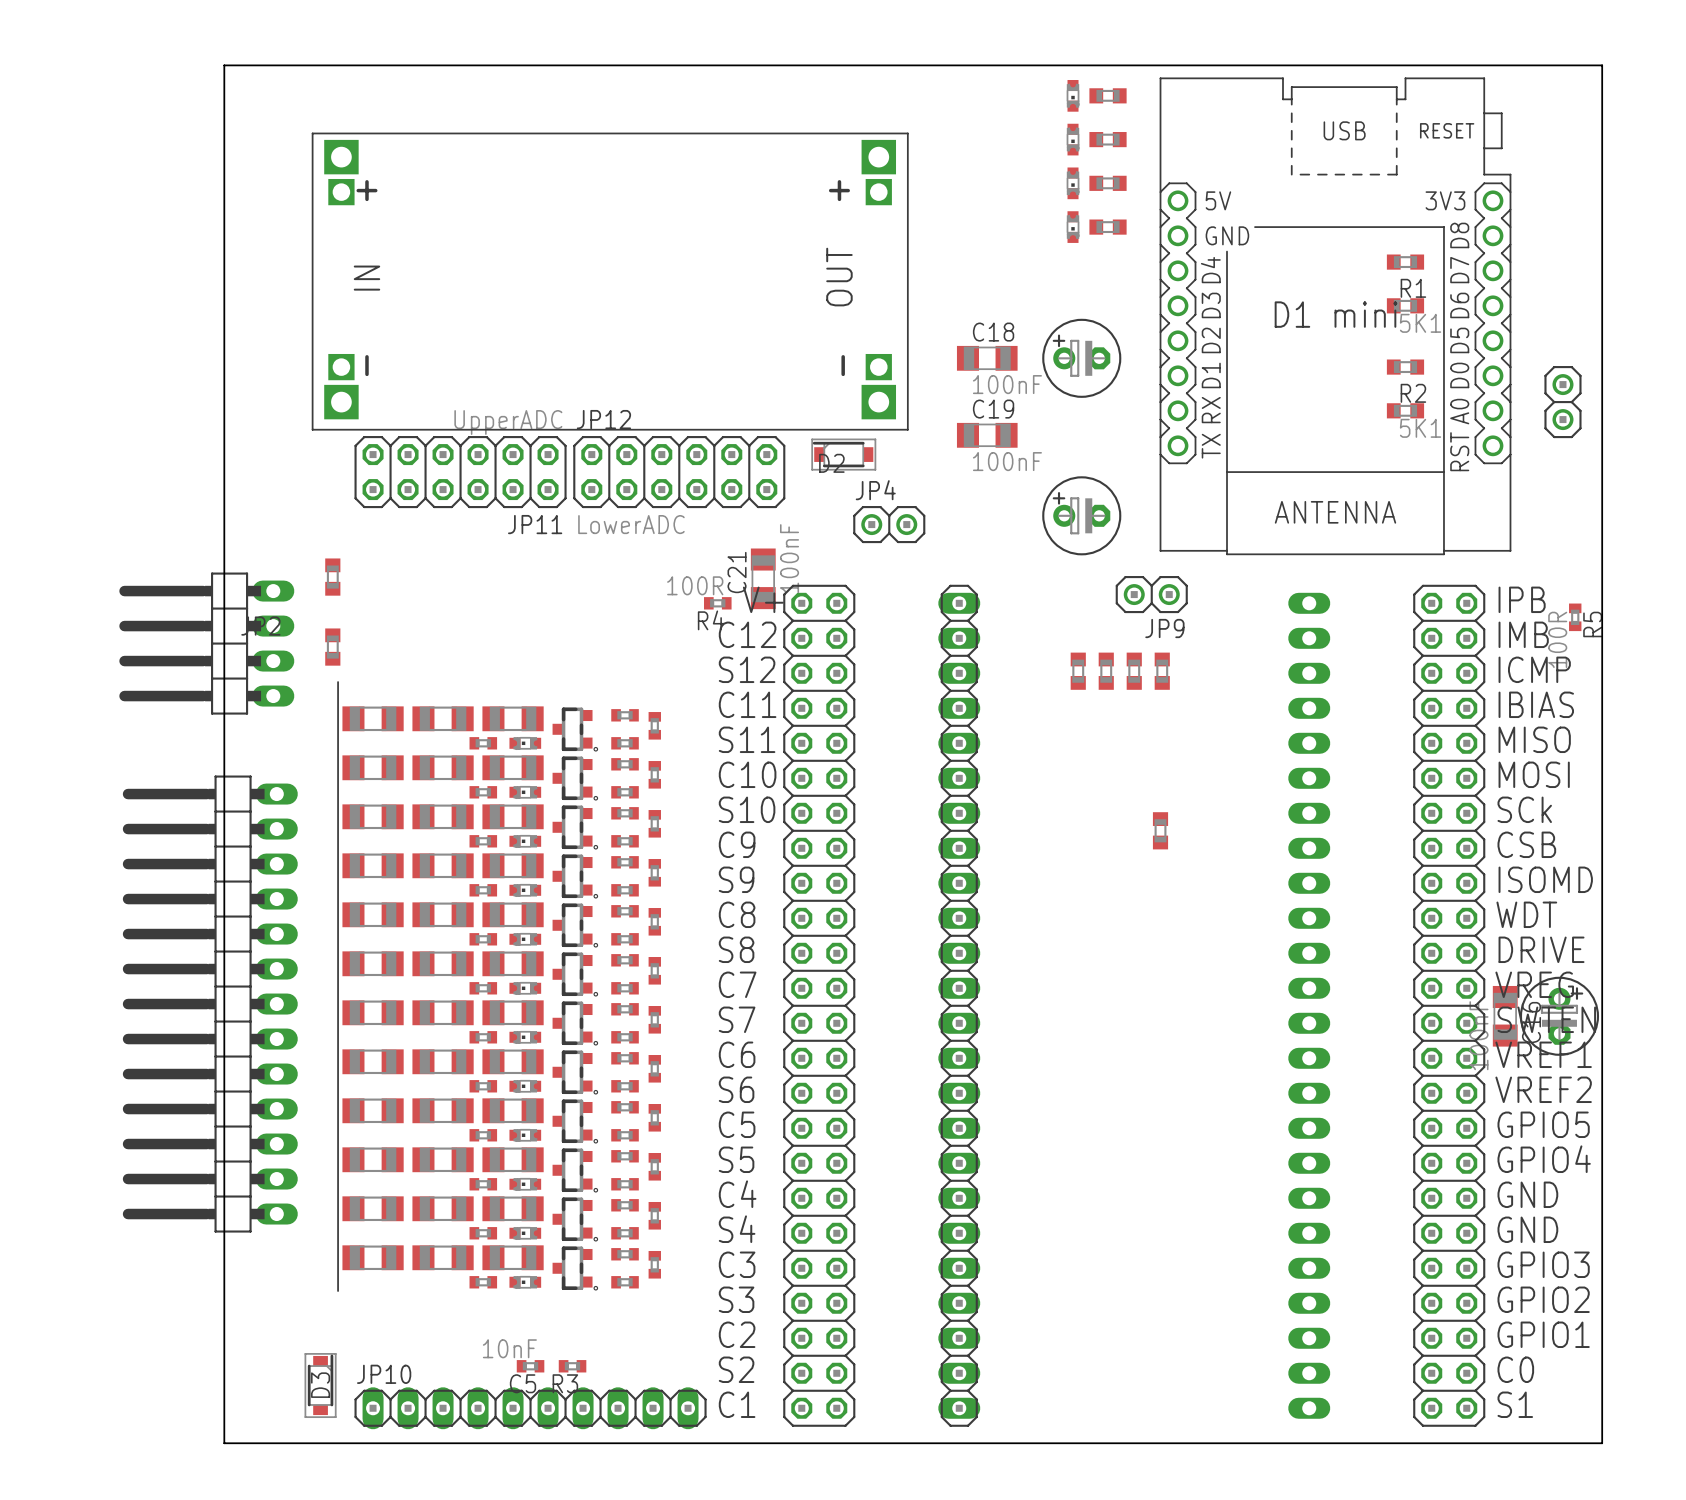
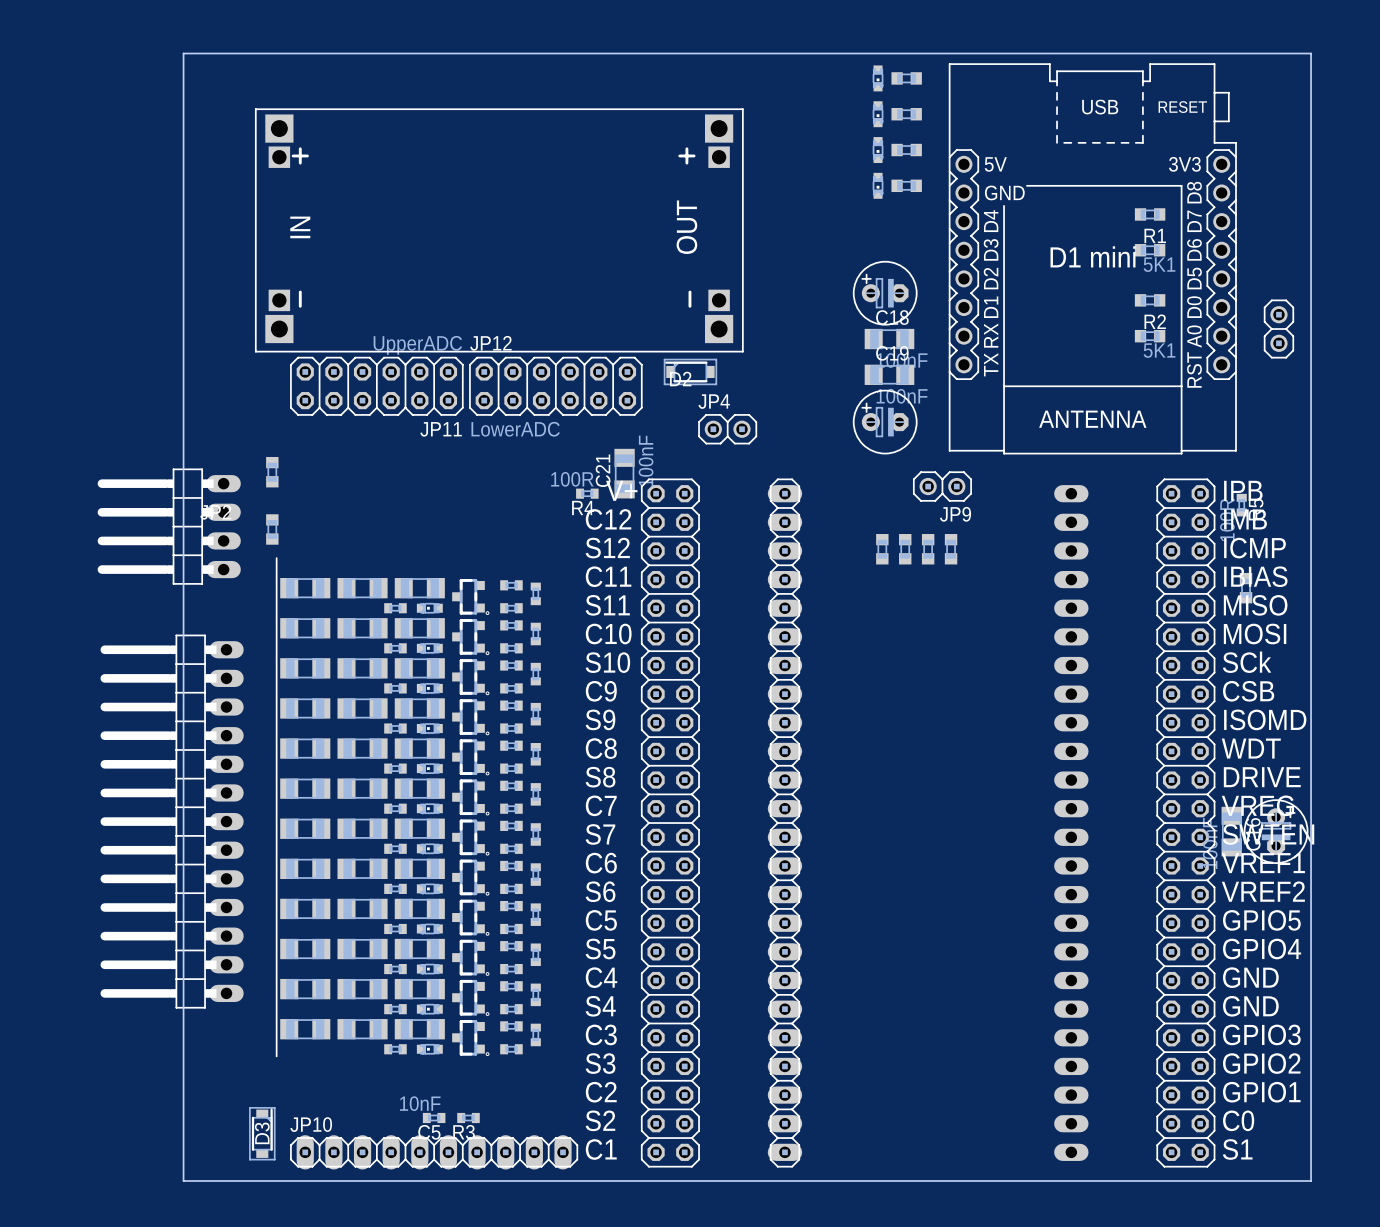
C18 position: (987, 358) -> (889, 339)
C19 position: (987, 435) -> (889, 374)
R5 position: (1575, 617) -> (1241, 505)
part: none -> (1246, 588)
part: (1160, 830) -> none

